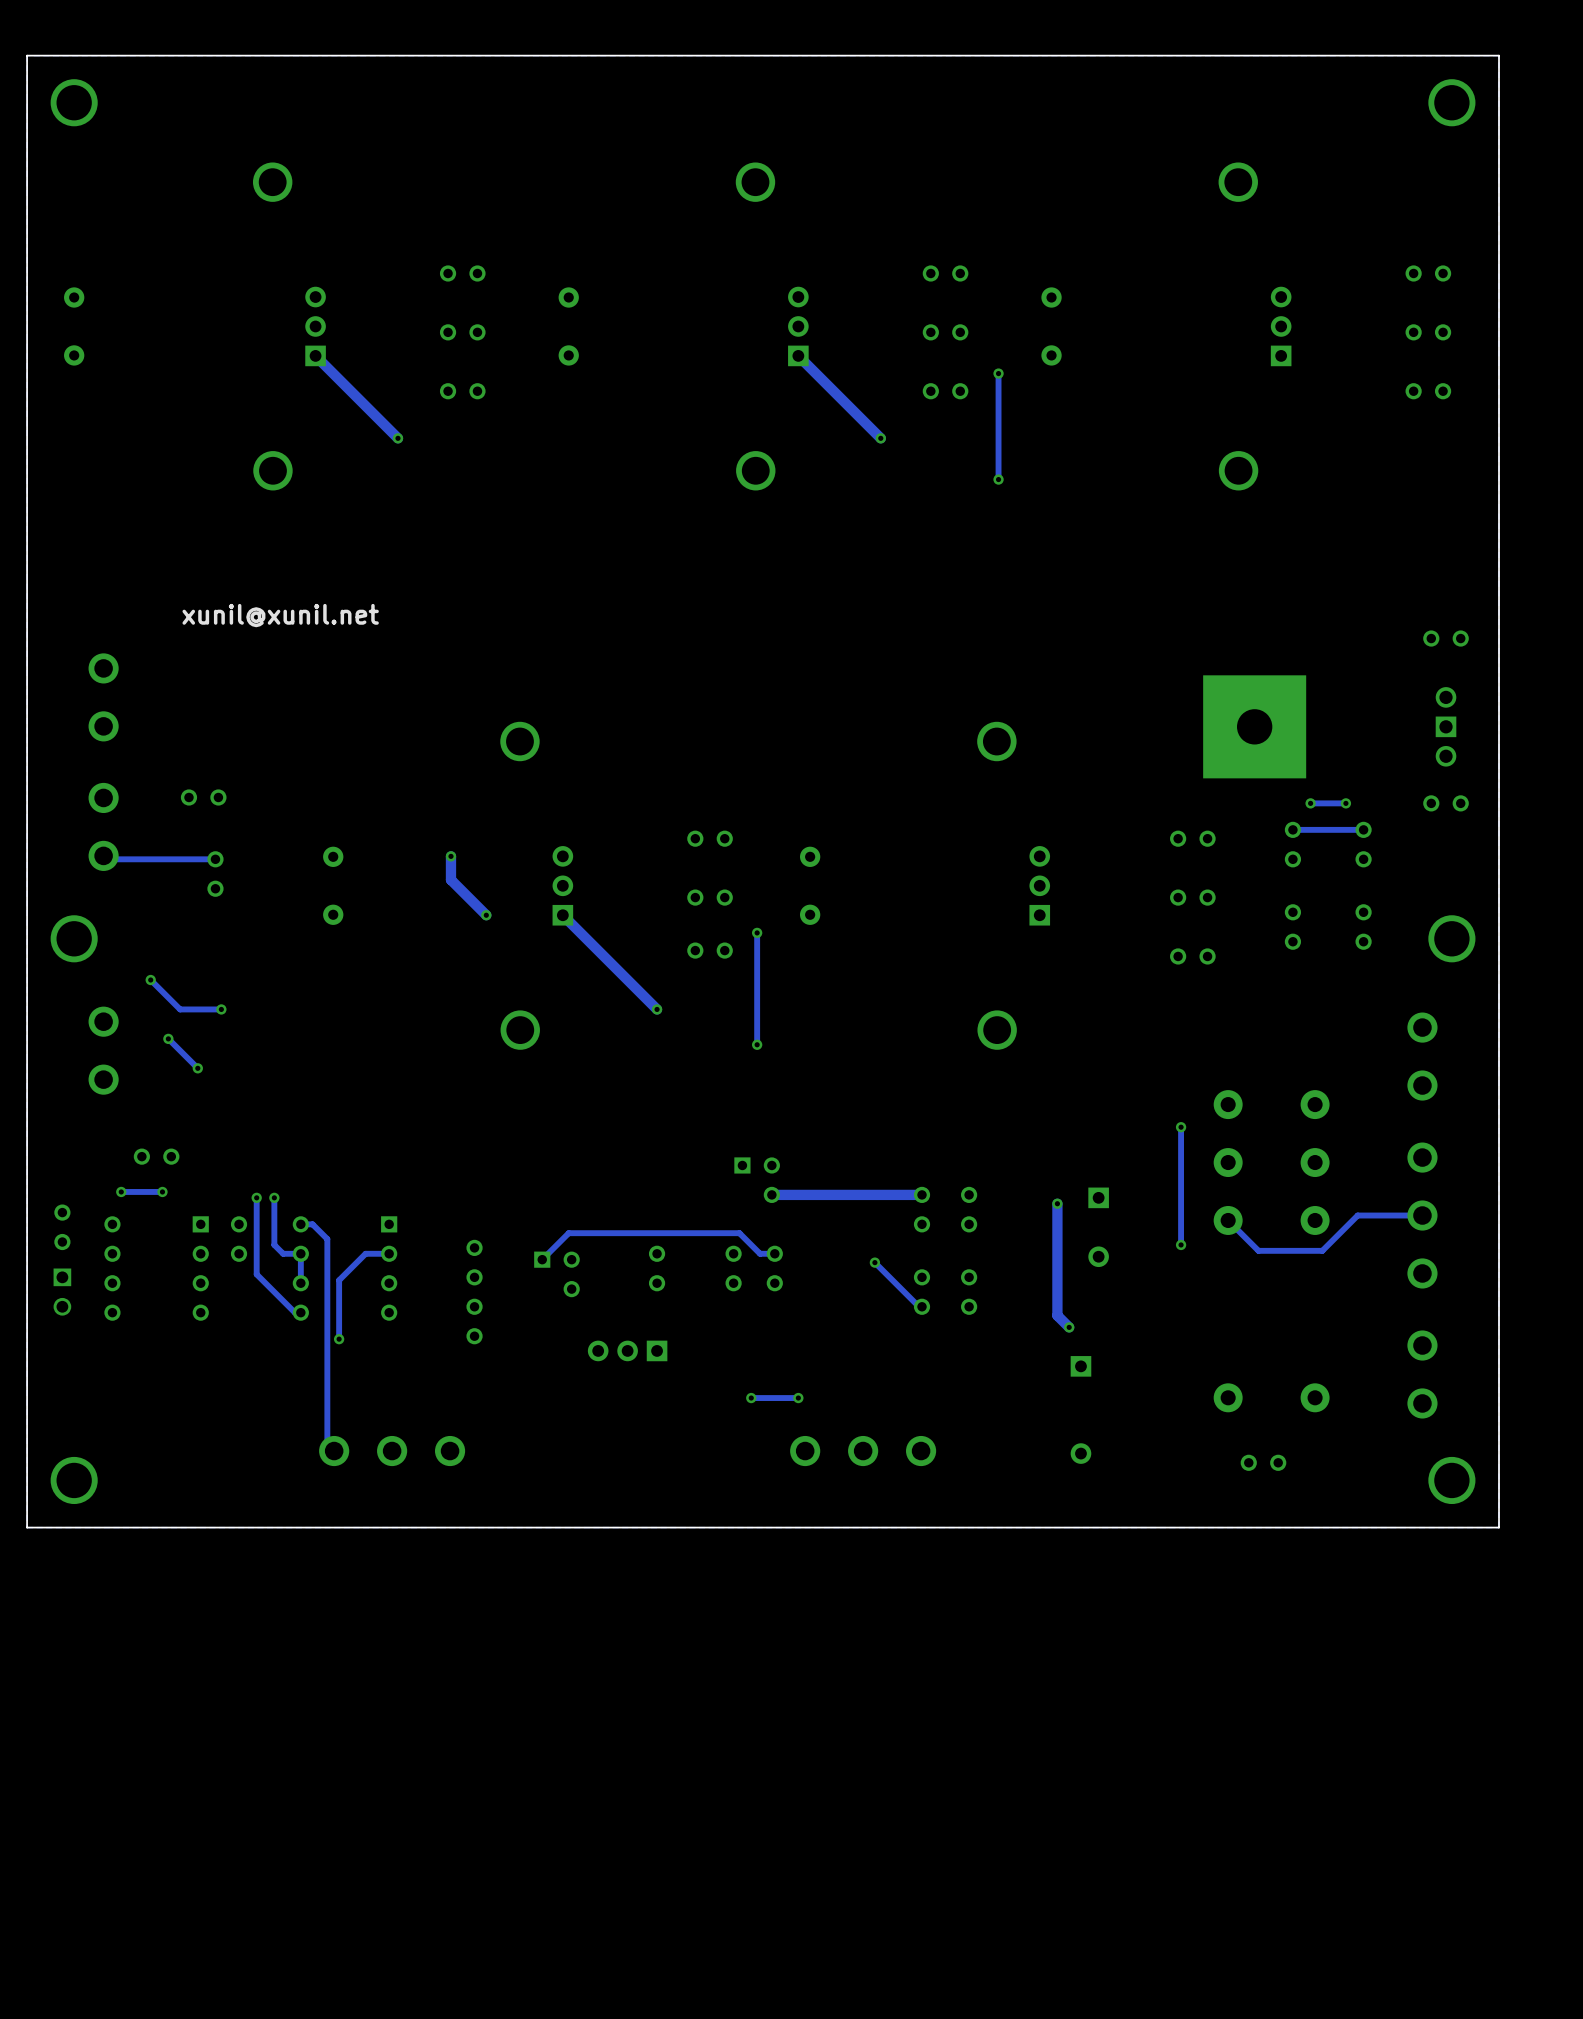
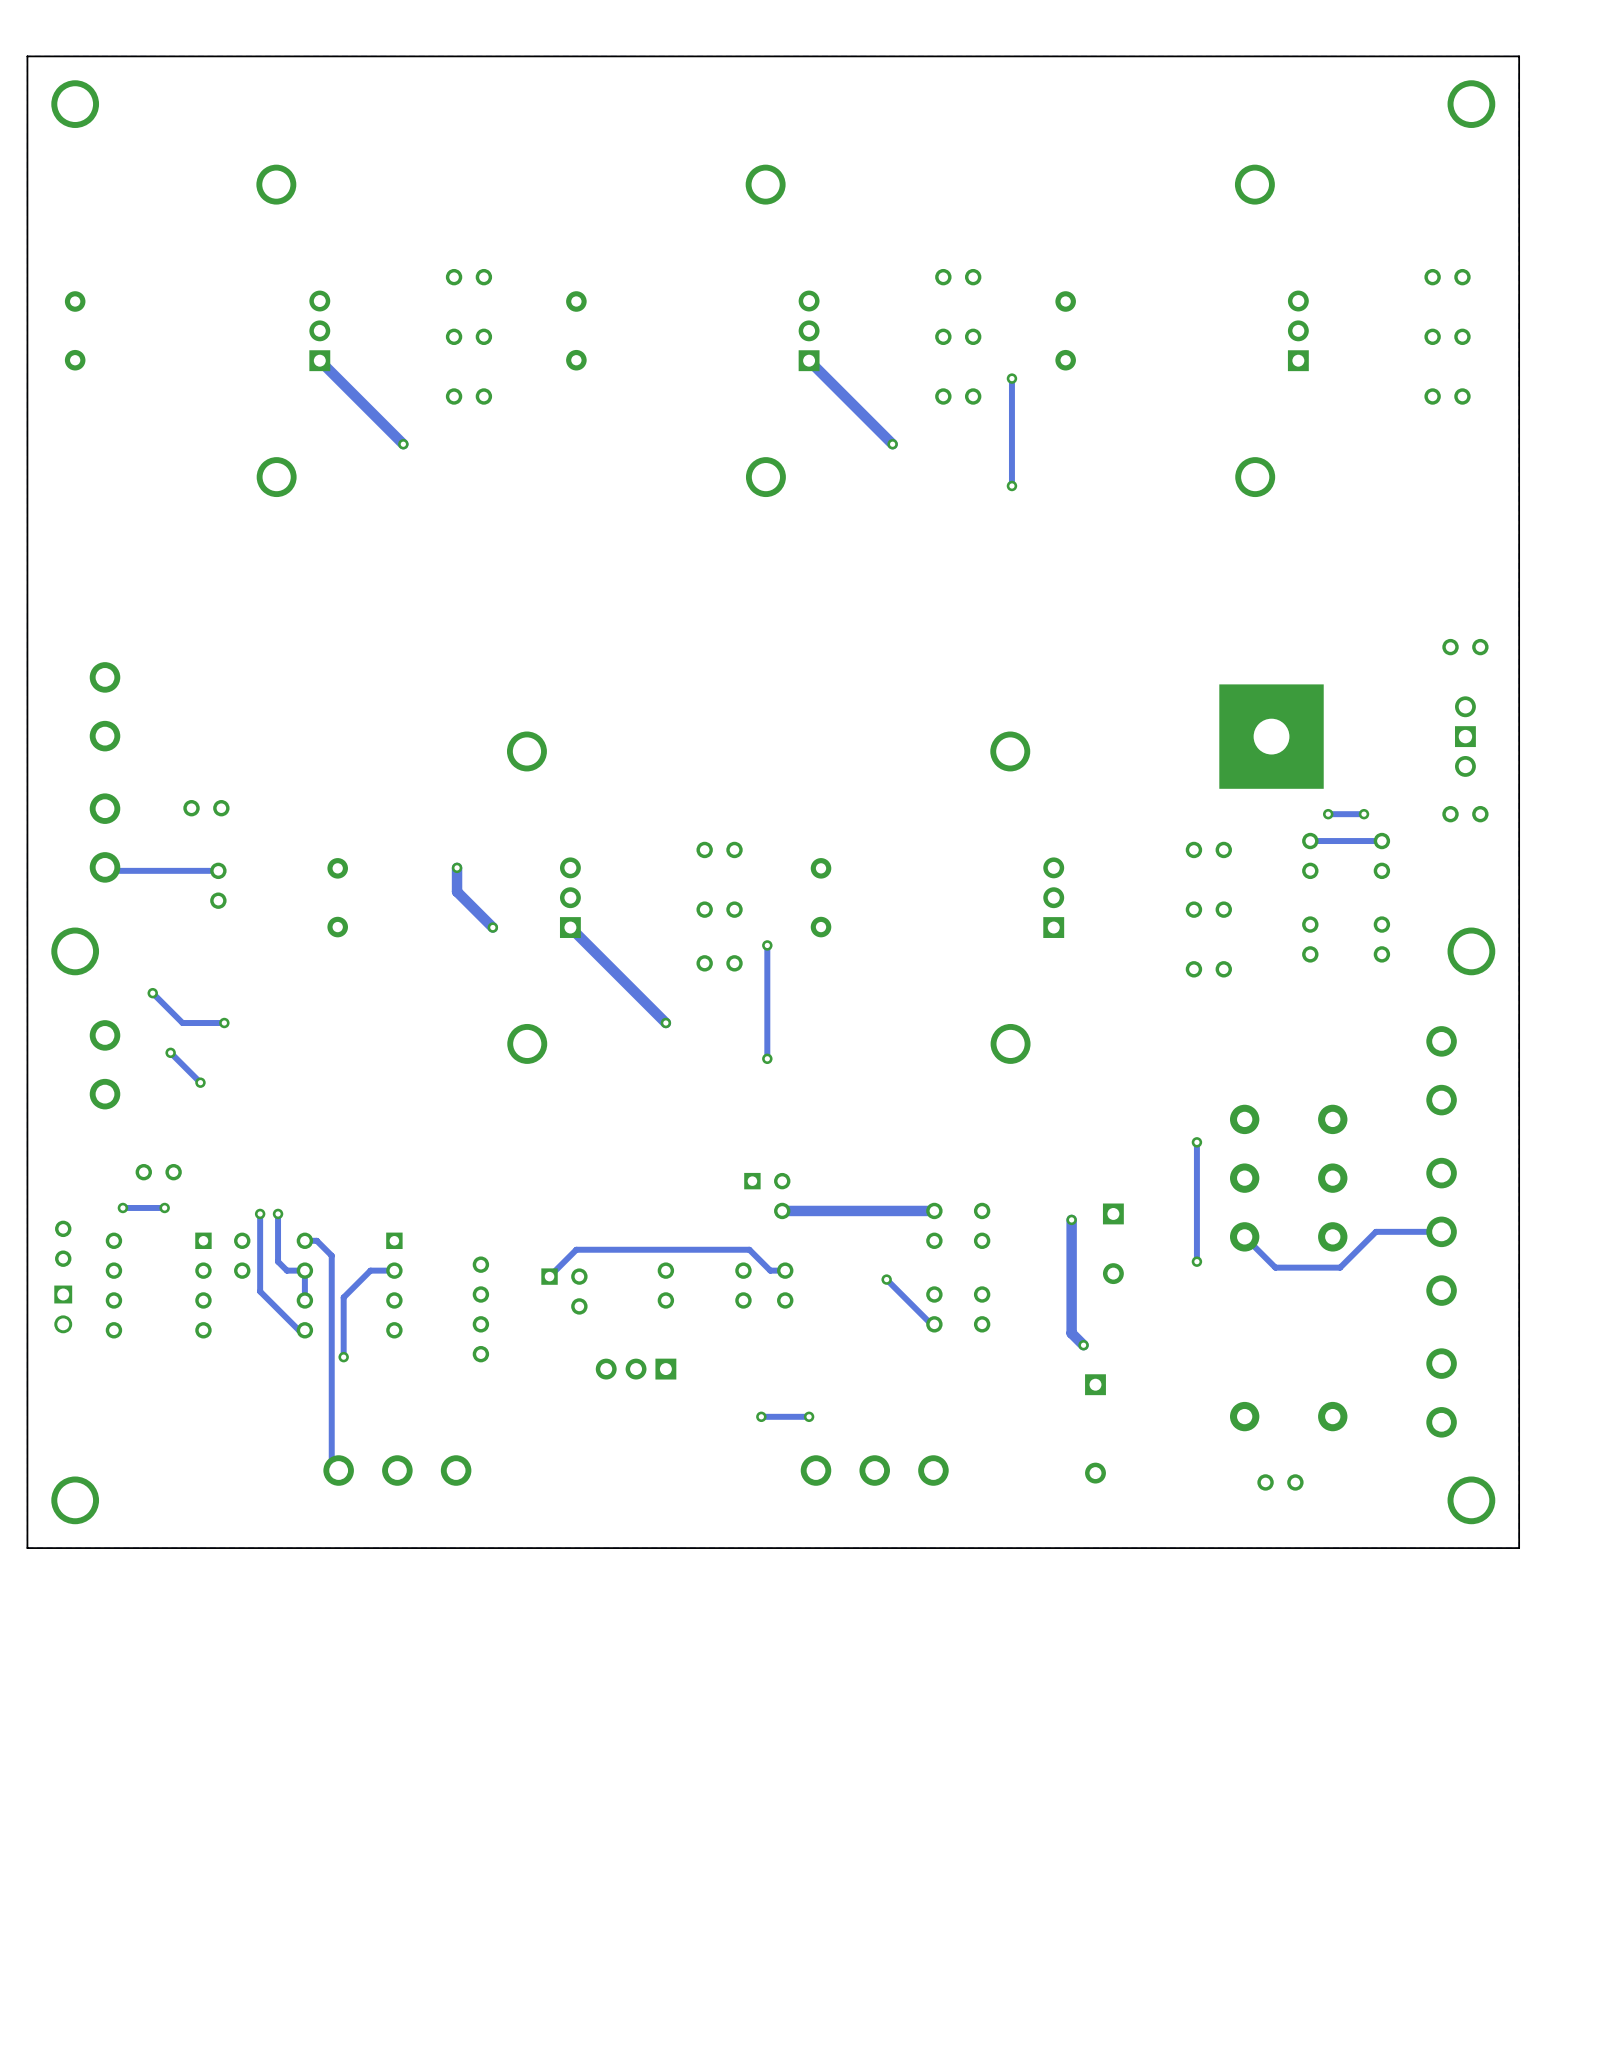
text: xunil@xunil.net (280, 615) -> none

